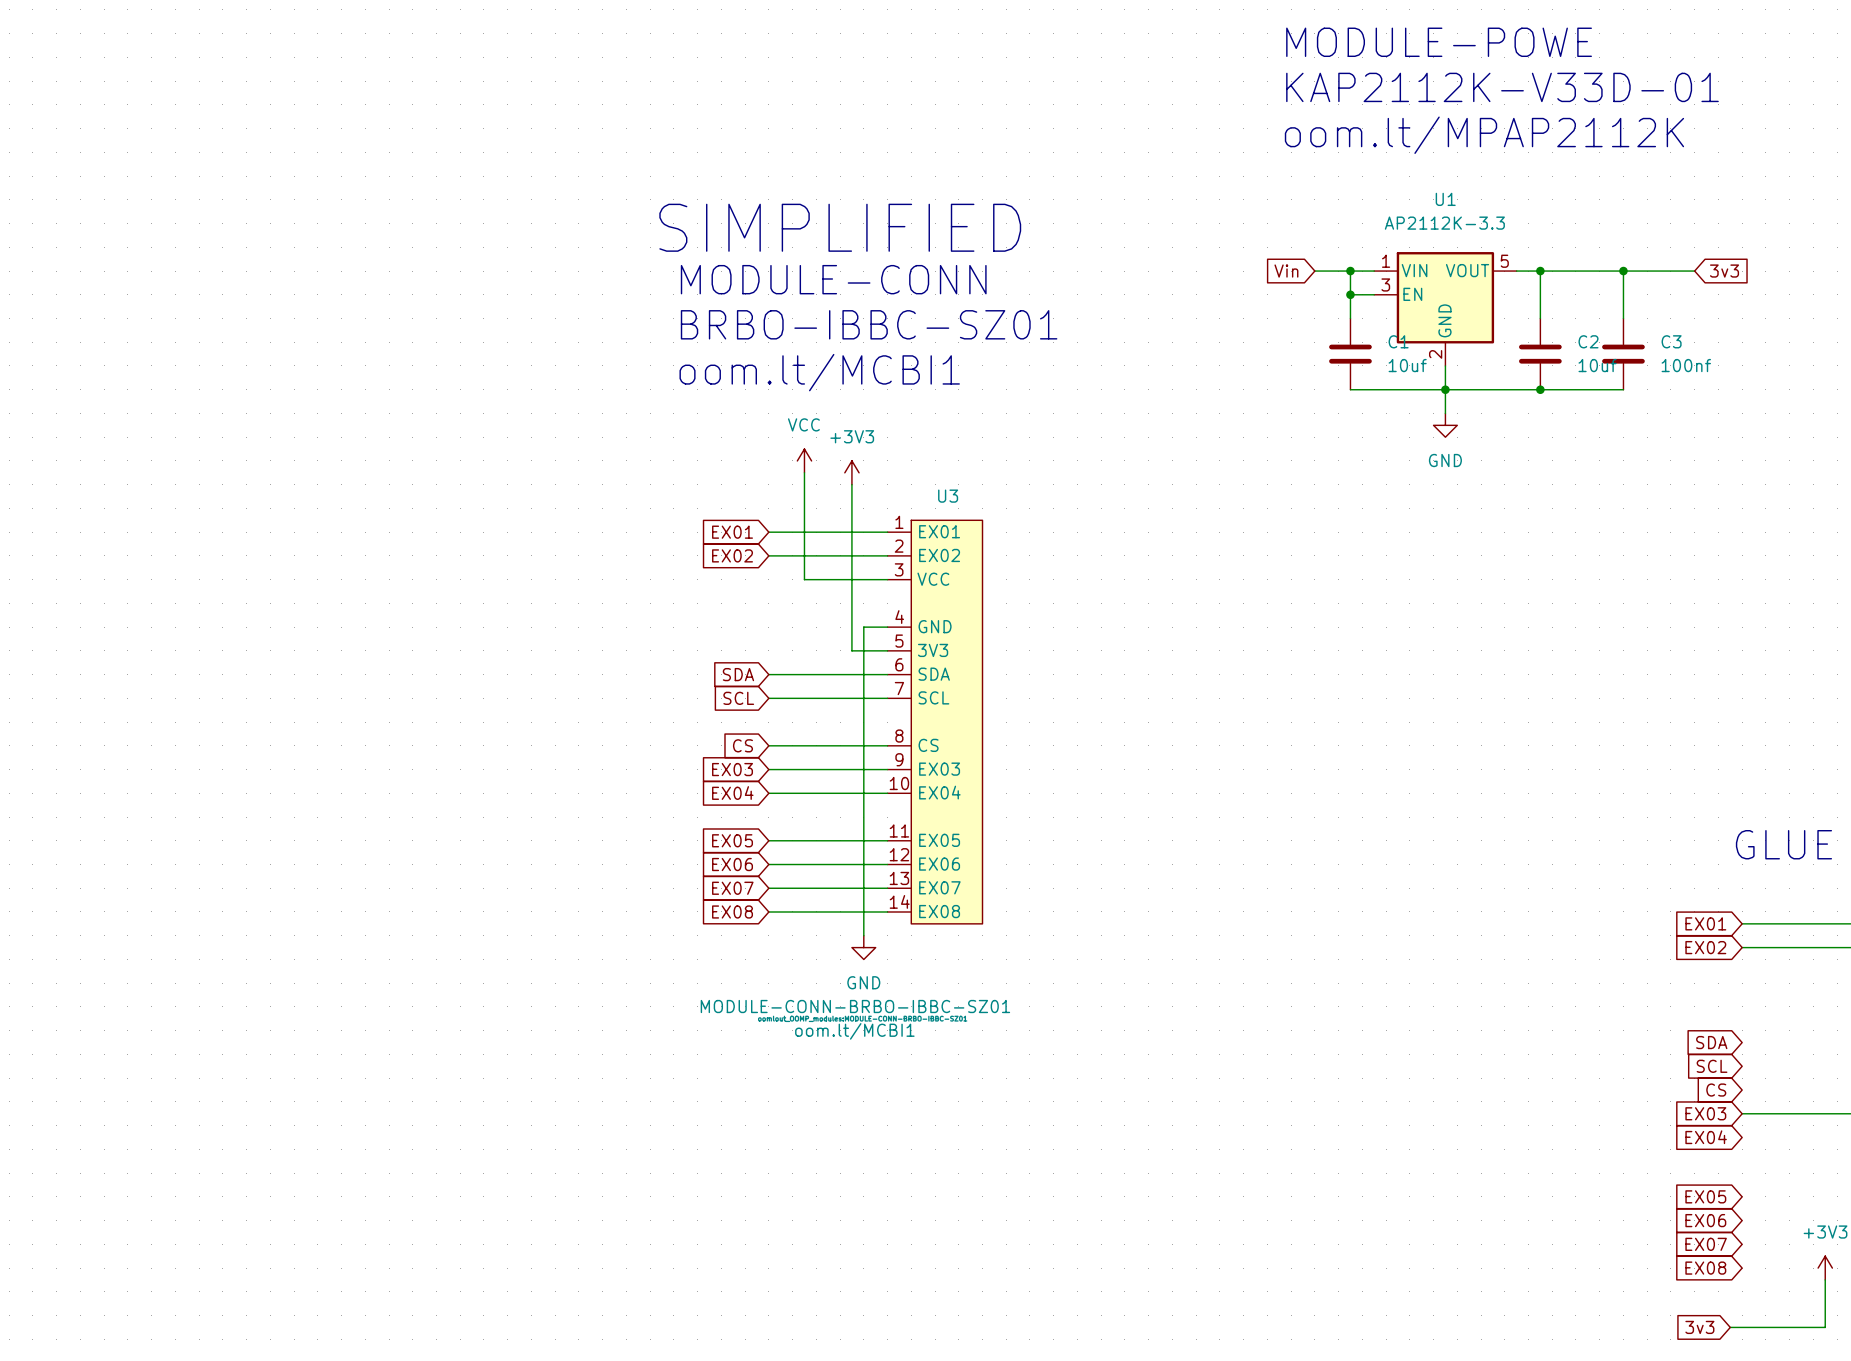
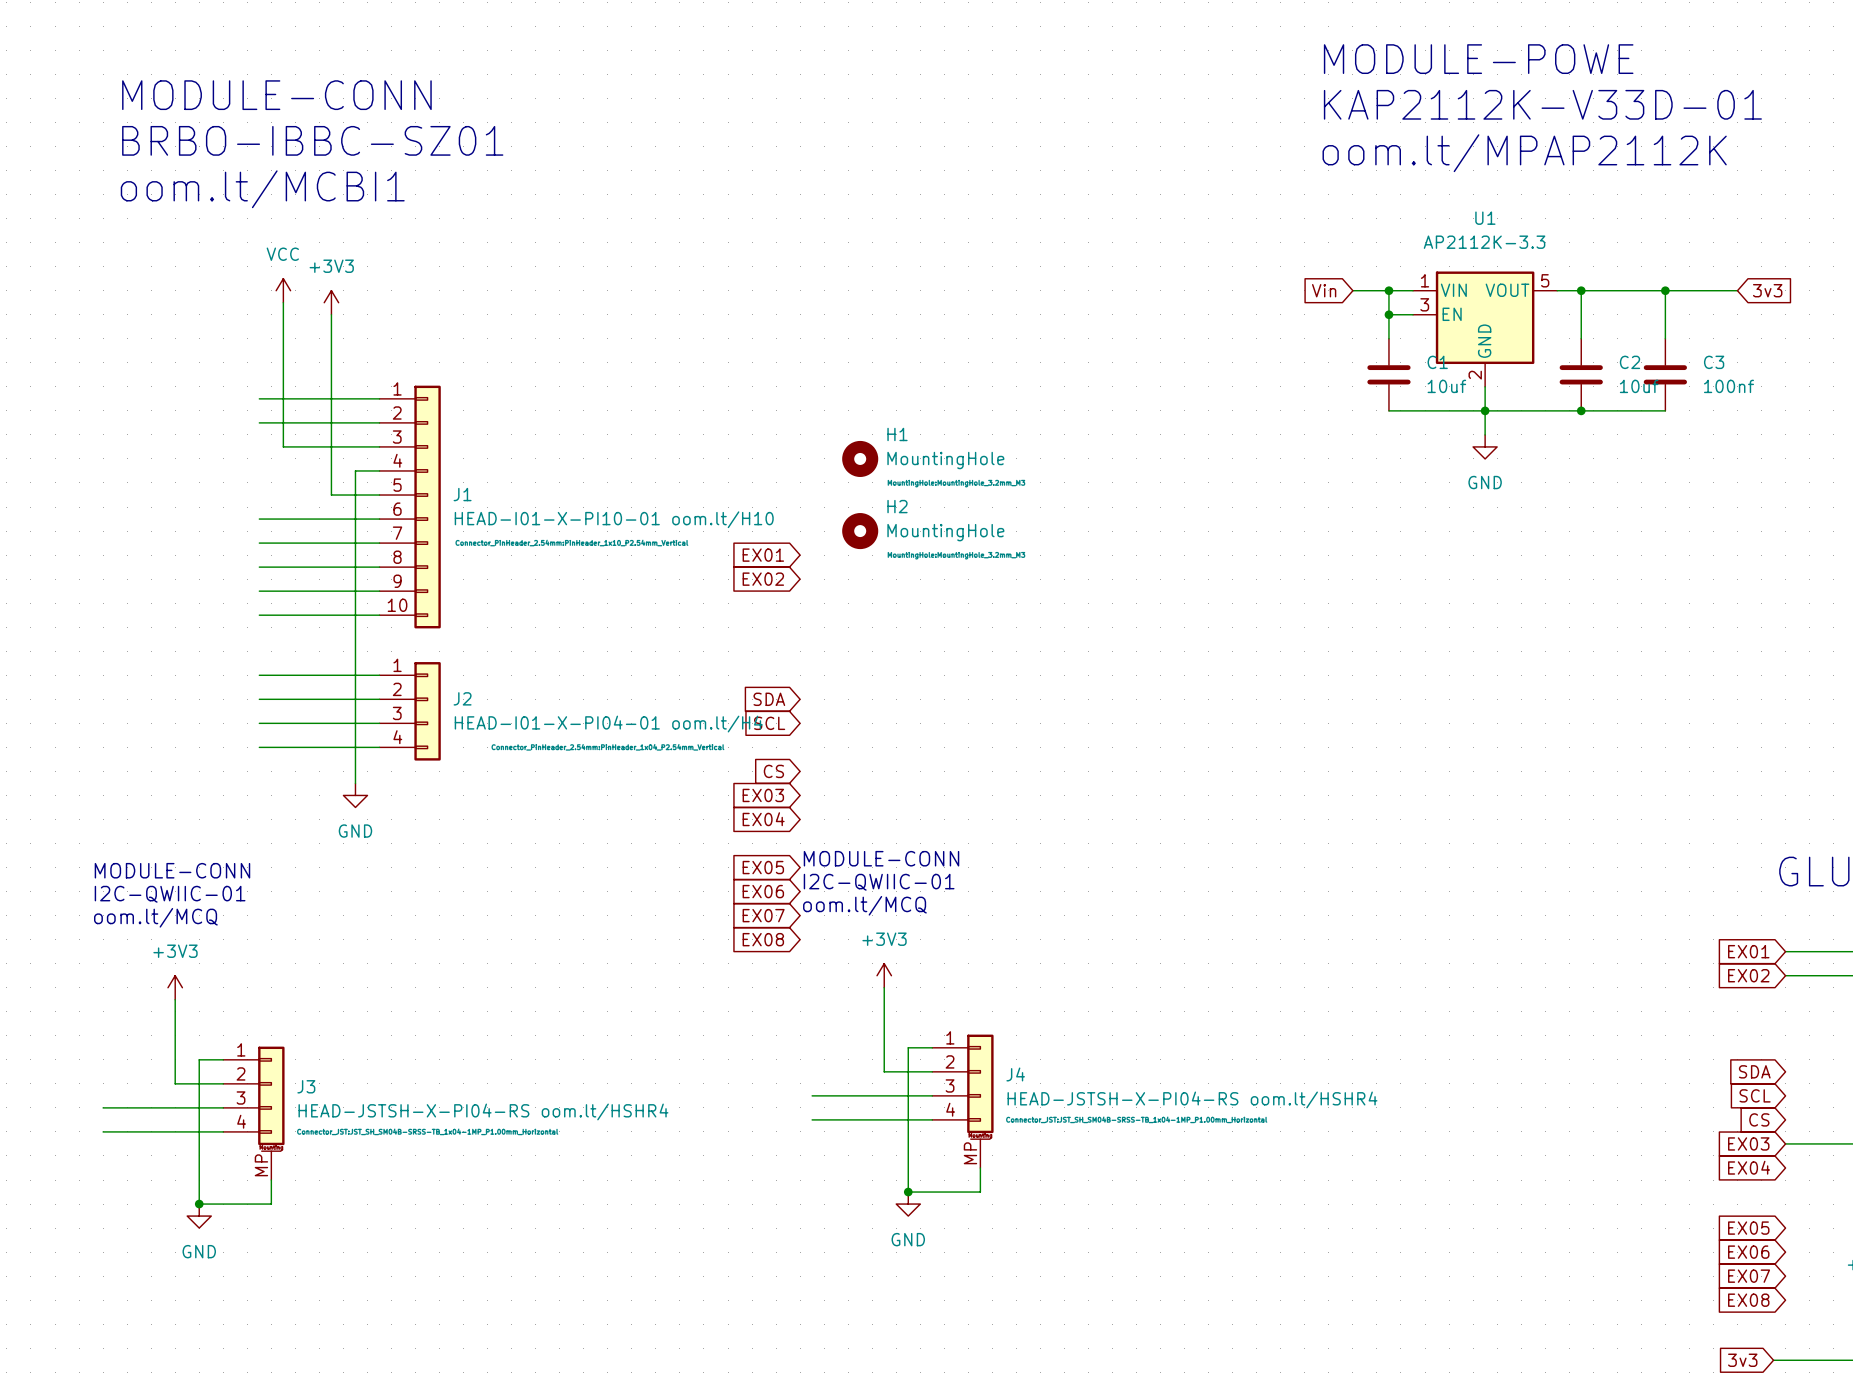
text: none -> MODULE-CONN (276, 95)
text: none -> BRBO-IBBC-SZ01 (312, 140)
text: none -> oom.lt/MCBI1 (262, 189)
text: SIMPLIFIED (840, 227) -> none
power symbol: none -> VCC (283, 290)
text: MODULE-CONN (833, 279) -> none
wire: none -> (283, 302) (283, 446) (379, 446)
power symbol: none -> +3V3 (331, 302)
wire: none -> (331, 314) (331, 495) (379, 495)
text: BRBO-IBBC-SZ01 (869, 324) -> none
text: oom.lt/MCBI1 (819, 372) -> none
wire: none -> (259, 398) (379, 398)
wire: none -> (259, 422) (379, 422)
H1: none -> MountingHole (860, 458)
wire: none -> (379, 470) (355, 470) (355, 783)
power symbol: VCC (804, 460) -> none
wire: (804, 472) (804, 579) (887, 579) -> none
power symbol: +3V3 (851, 472) -> none
J1: none -> HEAD-I01-X-PI10-01 oom.lt/H10 (410, 507)
wire: (851, 484) (851, 650) (887, 650) -> none
wire: none -> (259, 519) (379, 519)
H2: none -> MountingHole (860, 531)
wire: none -> (259, 543) (379, 543)
wire: (768, 532) (887, 532) -> none
wire: none -> (259, 567) (379, 567)
wire: (768, 555) (887, 555) -> none
wire: none -> (259, 591) (379, 591)
wire: none -> (259, 615) (379, 615)
wire: (887, 627) (863, 627) (863, 935) -> none
wire: none -> (259, 675) (379, 675)
wire: none -> (259, 699) (379, 699)
wire: (768, 674) (887, 674) -> none
J2: none -> HEAD-I01-X-PI04-01 oom.lt/H4 (410, 711)
wire: none -> (259, 723) (379, 723)
wire: (768, 698) (887, 698) -> none
U3: MODULE-CONN-BRBO-IBBC-SZ01 (1166, 704) -> none
wire: none -> (259, 747) (379, 747)
wire: (768, 745) (887, 745) -> none
power symbol: none -> GND (355, 795)
wire: (768, 769) (887, 769) -> none
wire: (768, 793) (887, 793) -> none
text: none -> MODULE-CONN (881, 858)
wire: (768, 840) (887, 840) -> none
text: none -> MODULE-CONN (172, 870)
text: none -> I2C-QWIIC-01 (879, 882)
wire: (768, 864) (887, 864) -> none
text: none -> I2C-QWIIC-01 (170, 894)
text: none -> oom.lt/MCQ (864, 905)
wire: (768, 888) (887, 888) -> (812, 1095) (932, 1095)
text: none -> oom.lt/MCQ (155, 917)
wire: (768, 911) (887, 911) -> (812, 1119) (932, 1119)
power symbol: none -> +3V3 (884, 975)
power symbol position: GND (863, 947) -> GND (908, 1204)
power symbol: none -> +3V3 (175, 987)
wire: none -> (884, 987) (884, 1071) (932, 1071)
wire: none -> (175, 999) (175, 1083) (223, 1083)
wire: none -> (932, 1047) (908, 1047) (908, 1192) (980, 1192) (980, 1167)
wire: none -> (223, 1059) (199, 1059) (199, 1204) (271, 1204) (271, 1180)
J4: none -> HEAD-JSTSH-X-PI04-RS oom.lt/HSHR4 (962, 1101)
wire: none -> (103, 1107) (223, 1107)
J3: none -> HEAD-JSTSH-X-PI04-RS oom.lt/HSHR4 (253, 1113)
wire: none -> (103, 1131) (223, 1131)
junction: none -> (908, 1192)
junction: none -> (199, 1204)
power symbol: none -> GND (199, 1216)

